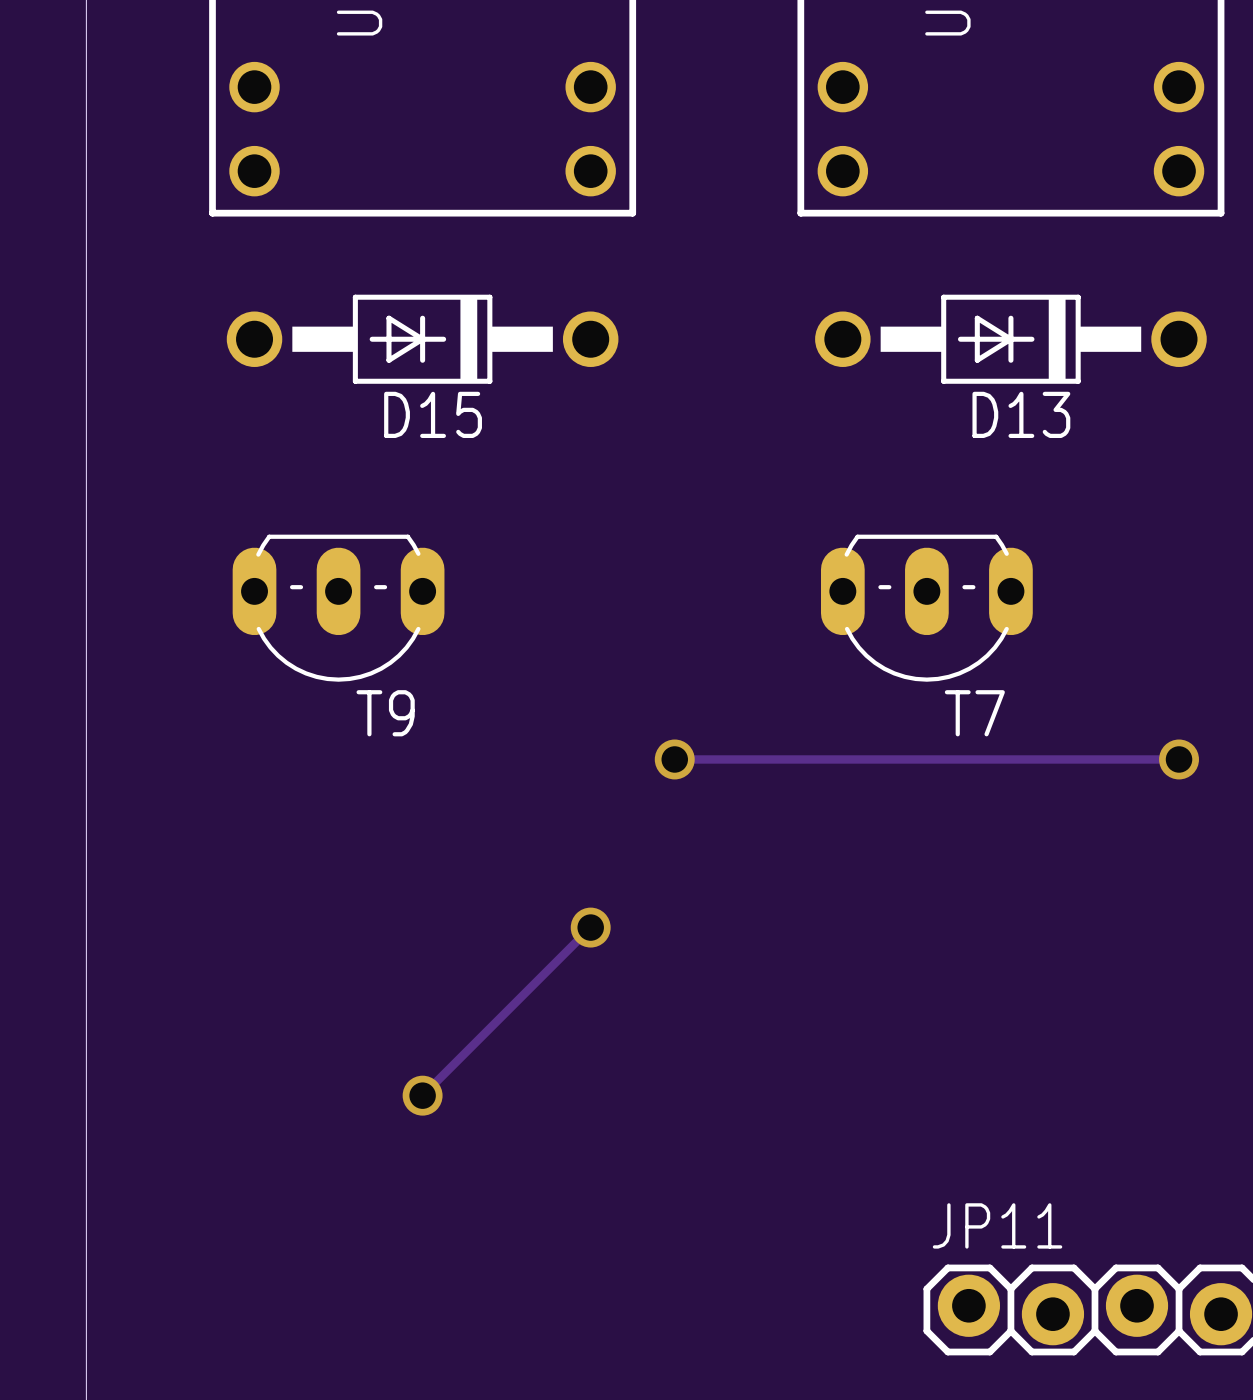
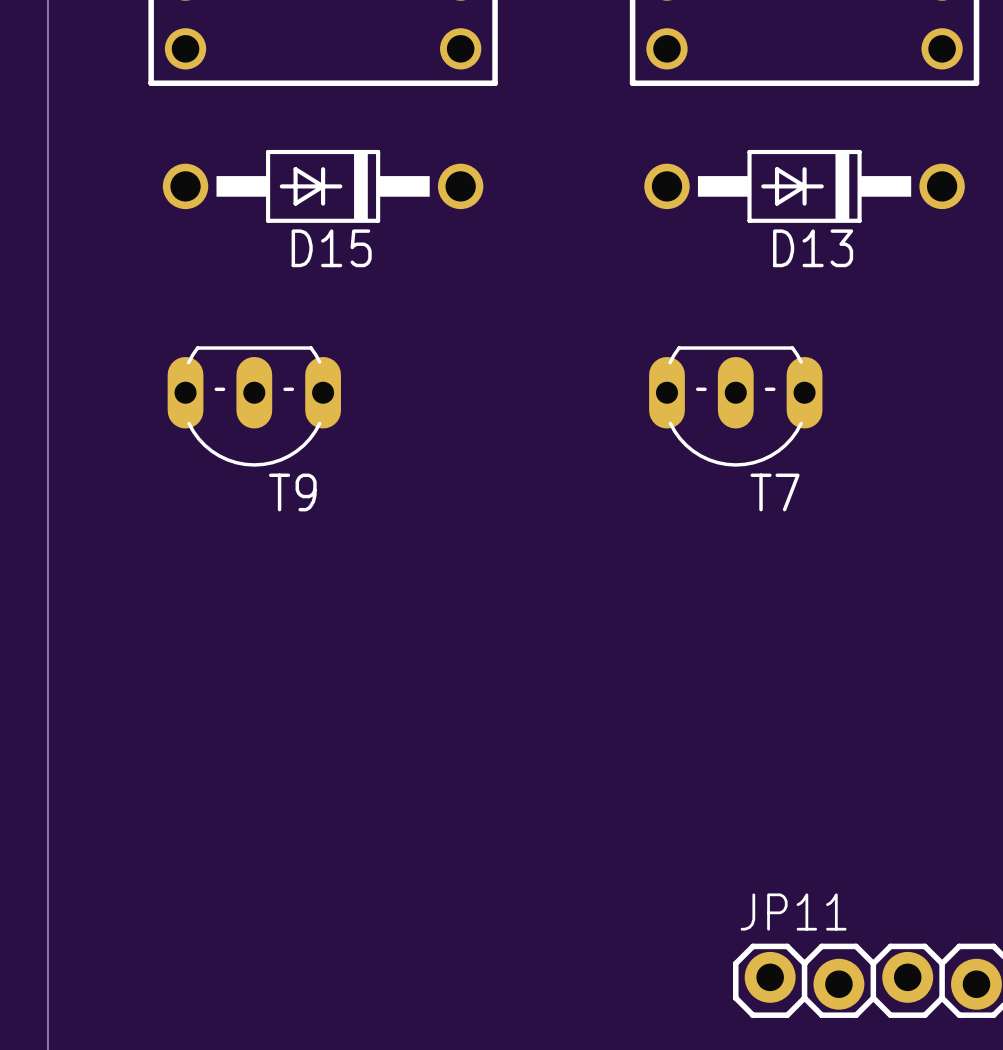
track: (674, 759) (1179, 759) -> none
via: (674, 759) -> none
via: (1179, 759) -> none
track: (590, 927) (422, 1095) -> none
via: (590, 927) -> none
via: (422, 1095) -> none

